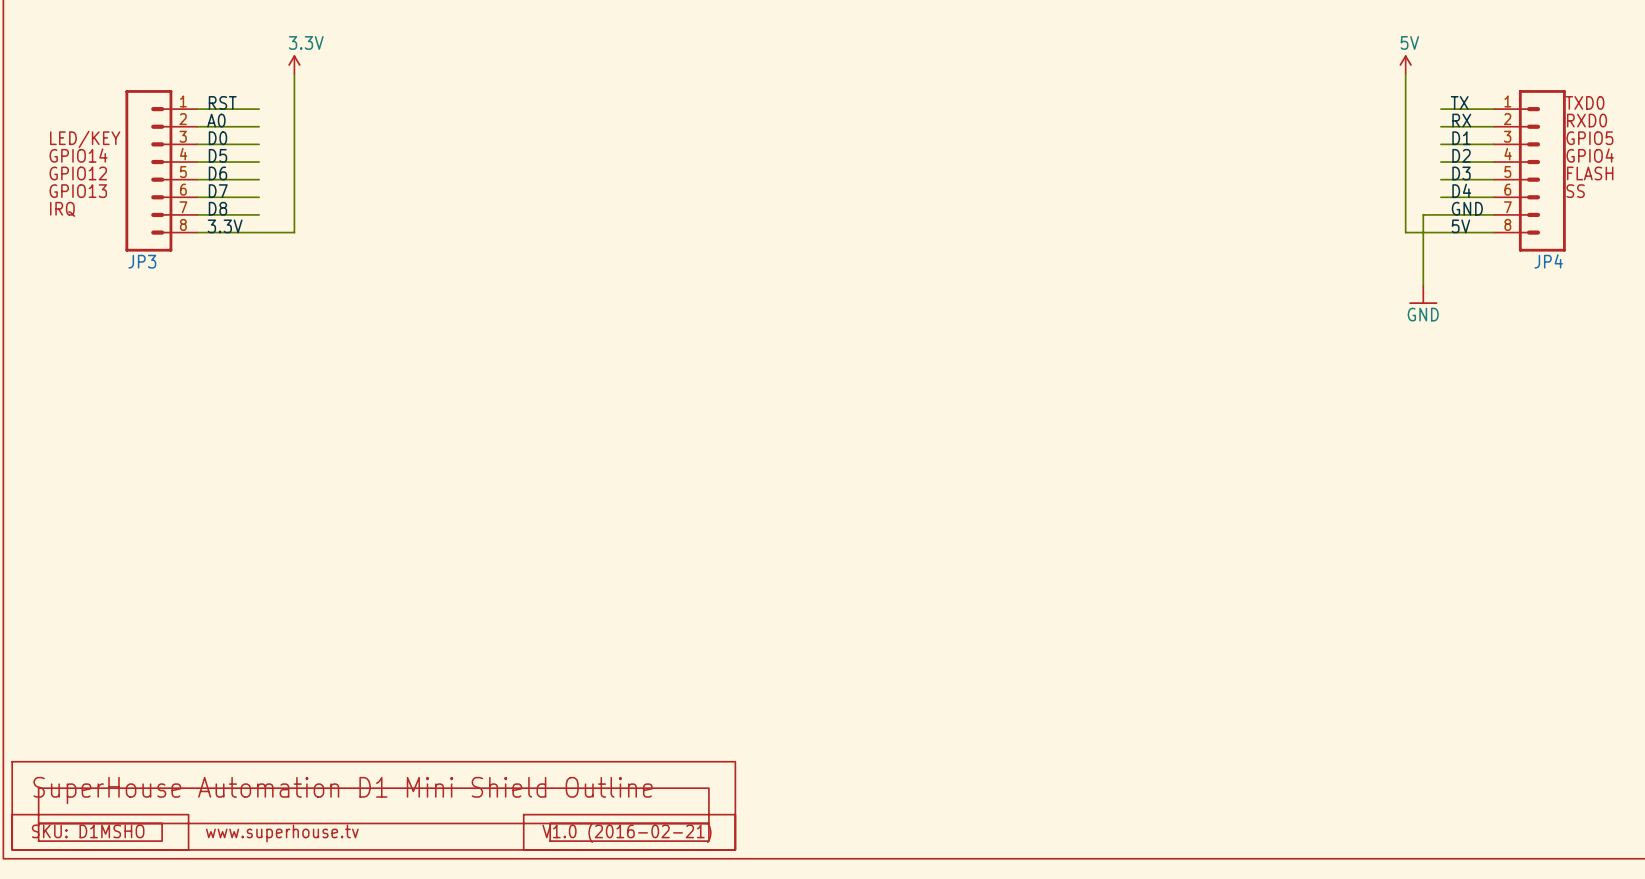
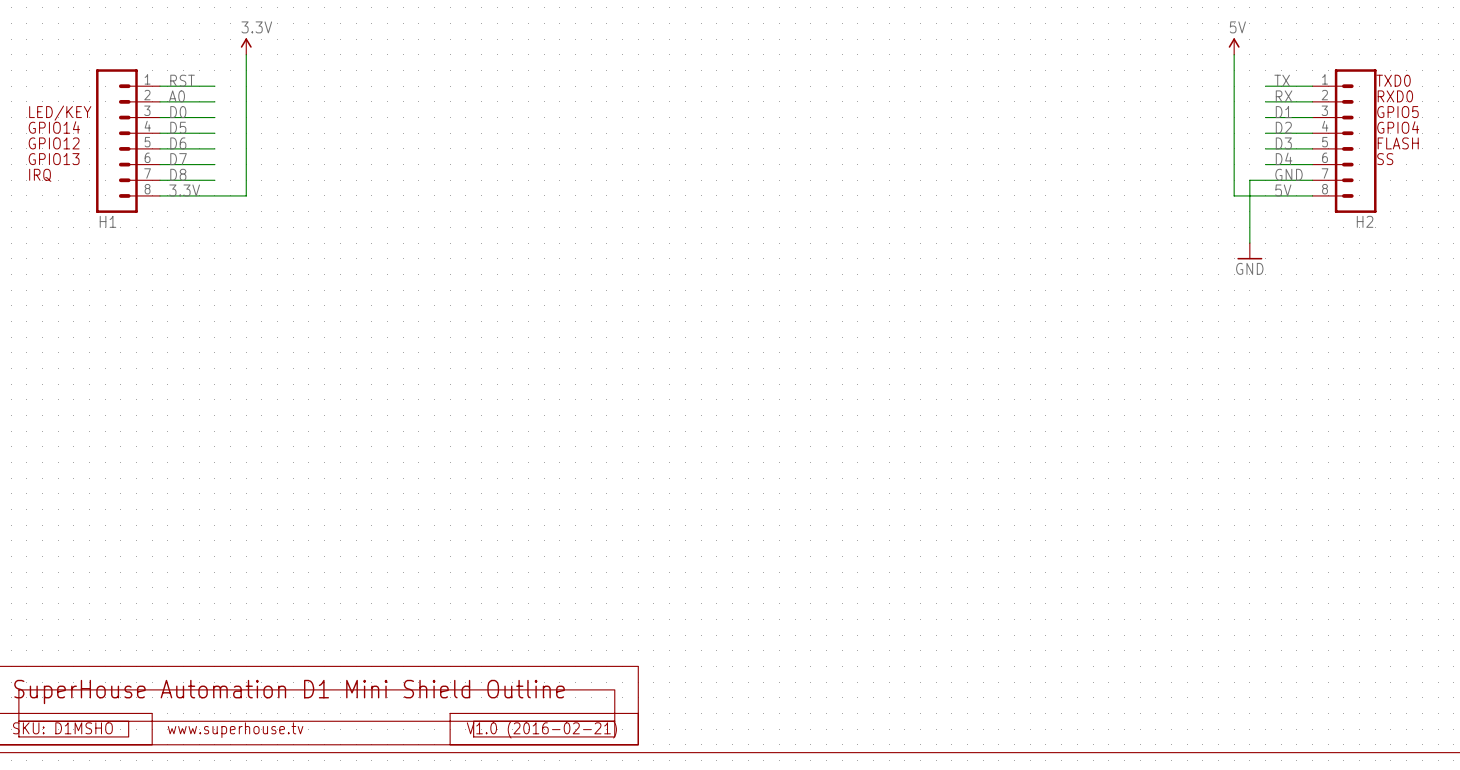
JP3 name: JP3 (142, 261) -> H1 (107, 221)
JP4 name: JP4 (1548, 261) -> H2 (1365, 221)

